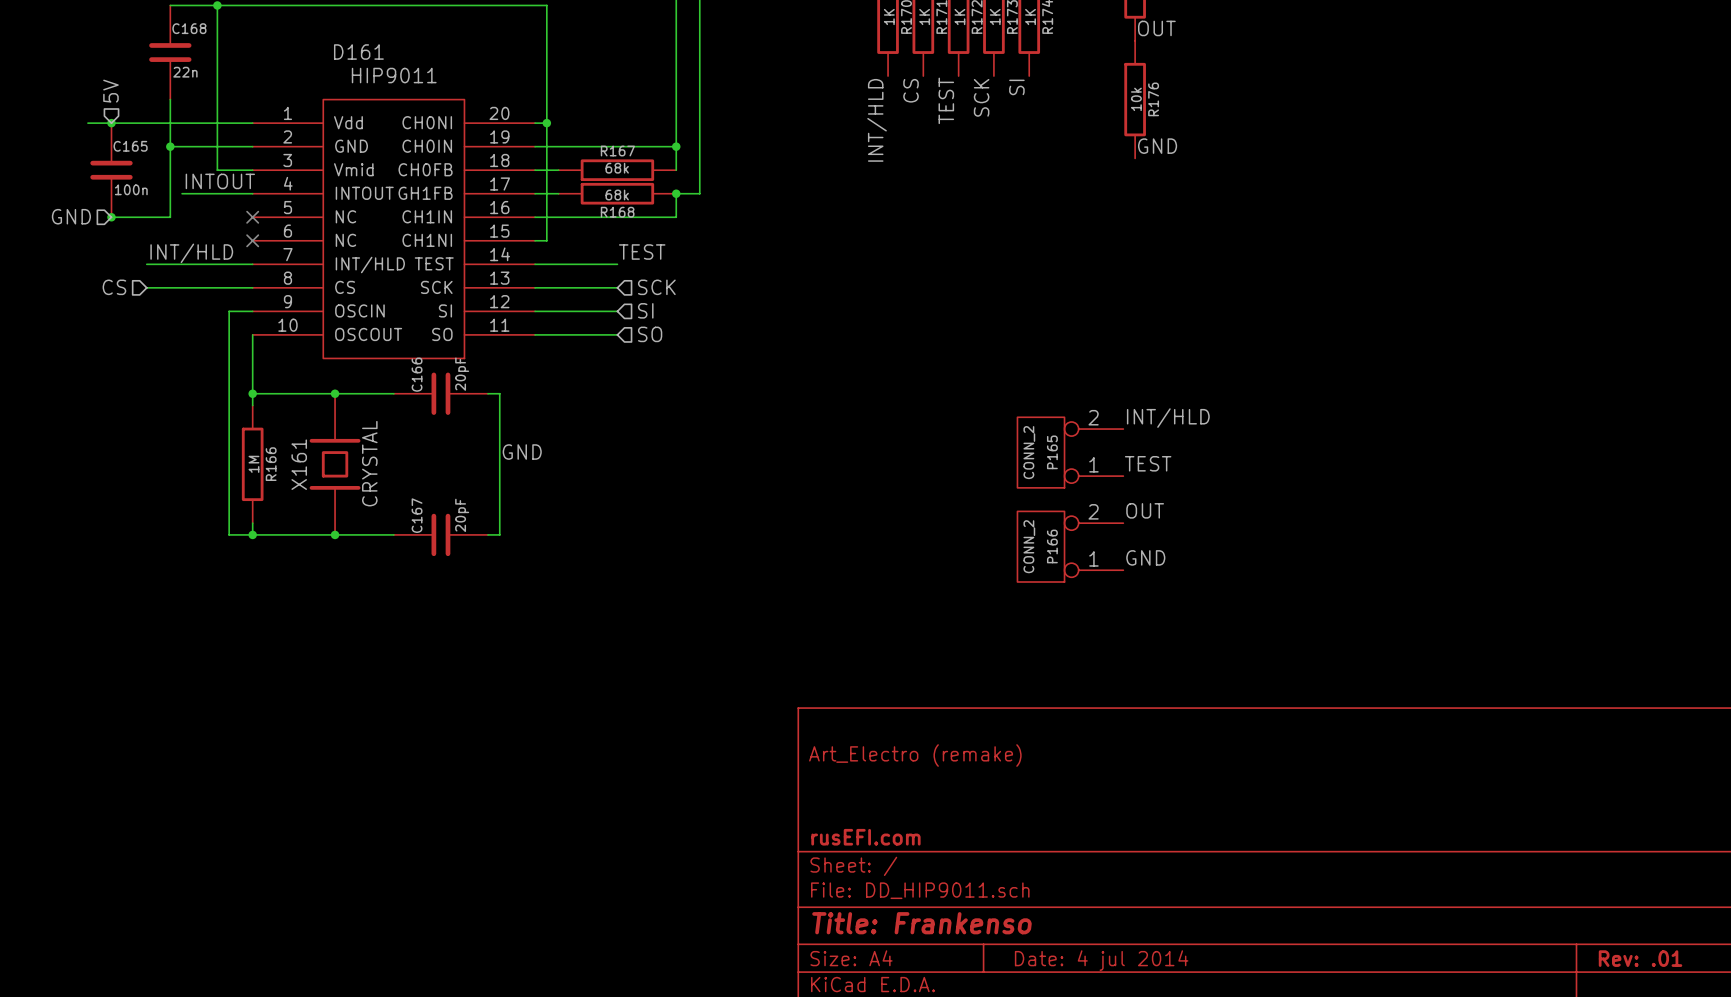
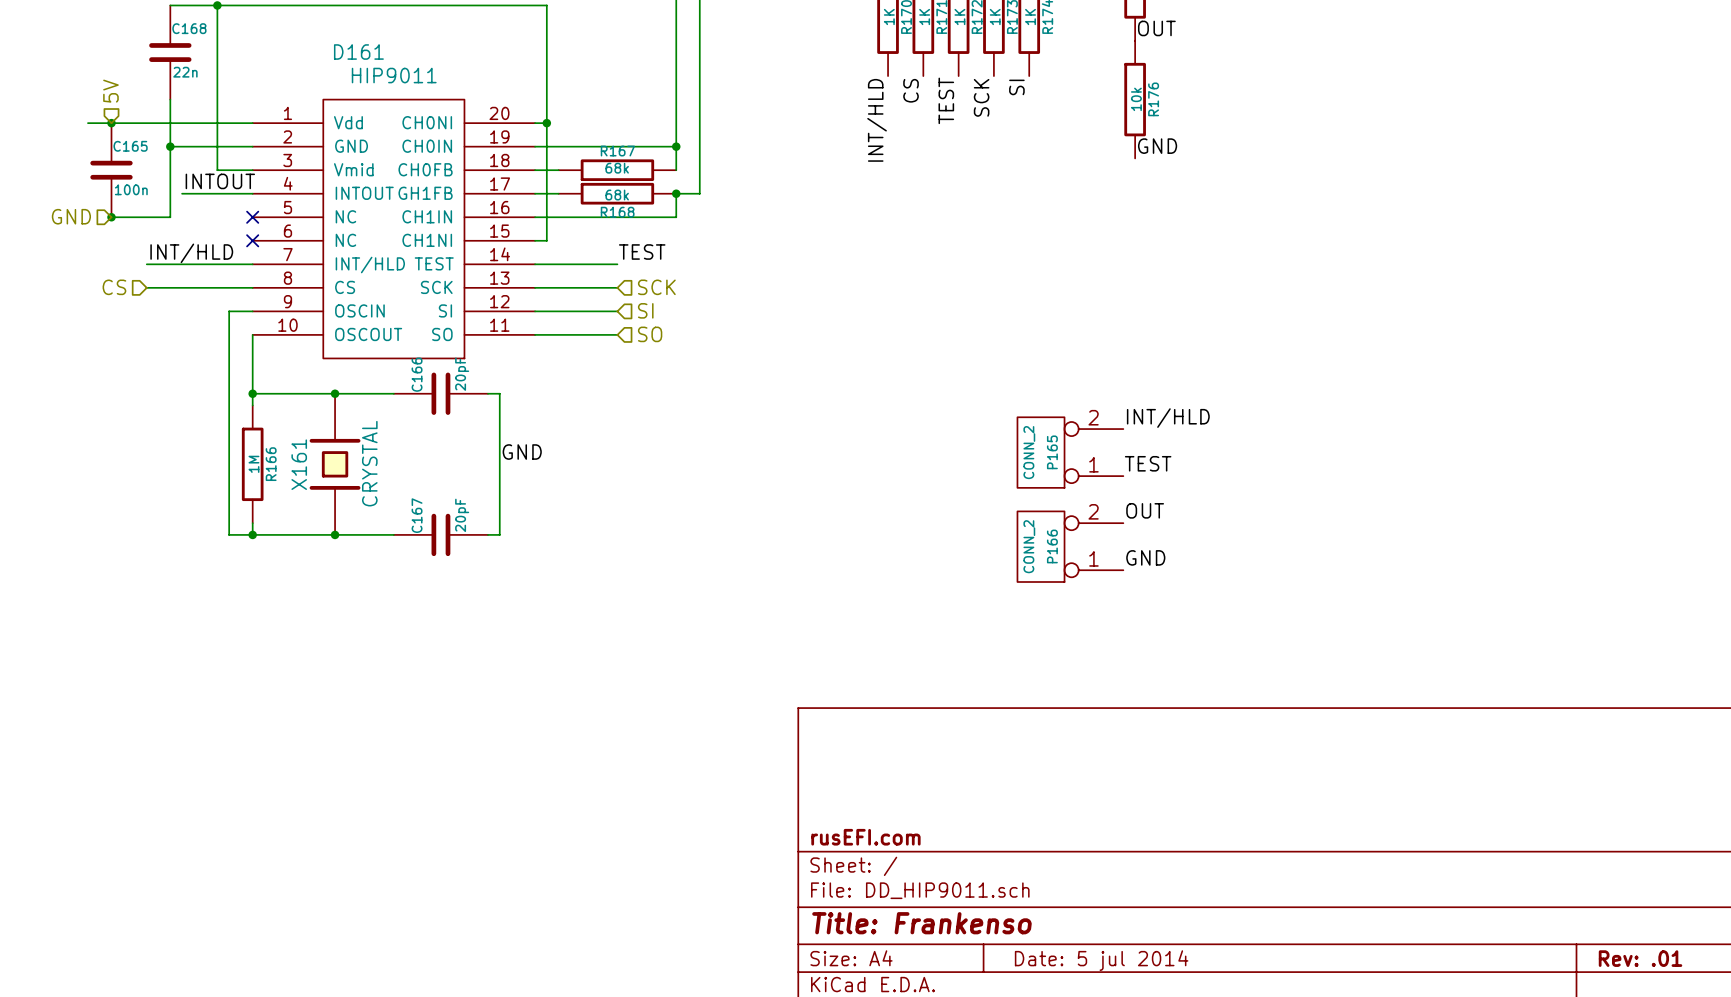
title block: Art_Electro (remake) (915, 755) -> none
title block: Date: 4 jul 2014 (1101, 960) -> Date: 5 jul 2014 (1101, 960)

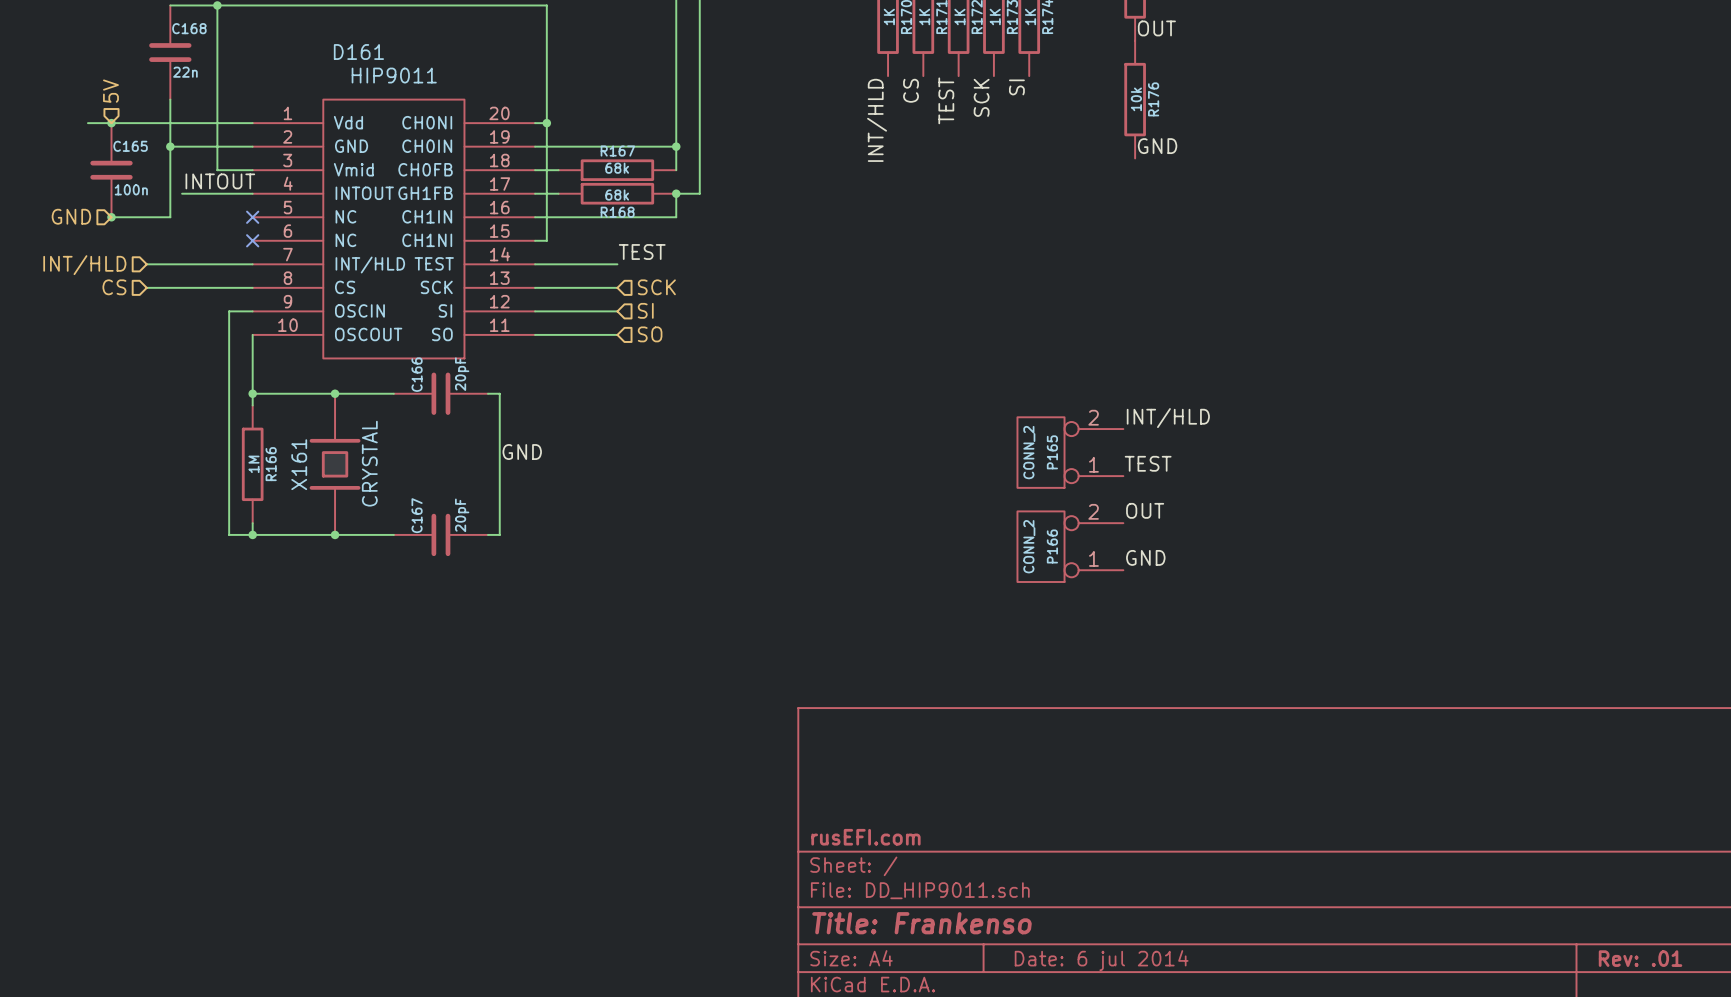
label: INT/HLD (191, 253) -> none
hierarchical label: none -> INT/HLD (84, 265)
title block: Date: 5 jul 2014 (1101, 960) -> Date: 6 jul 2014 (1101, 960)

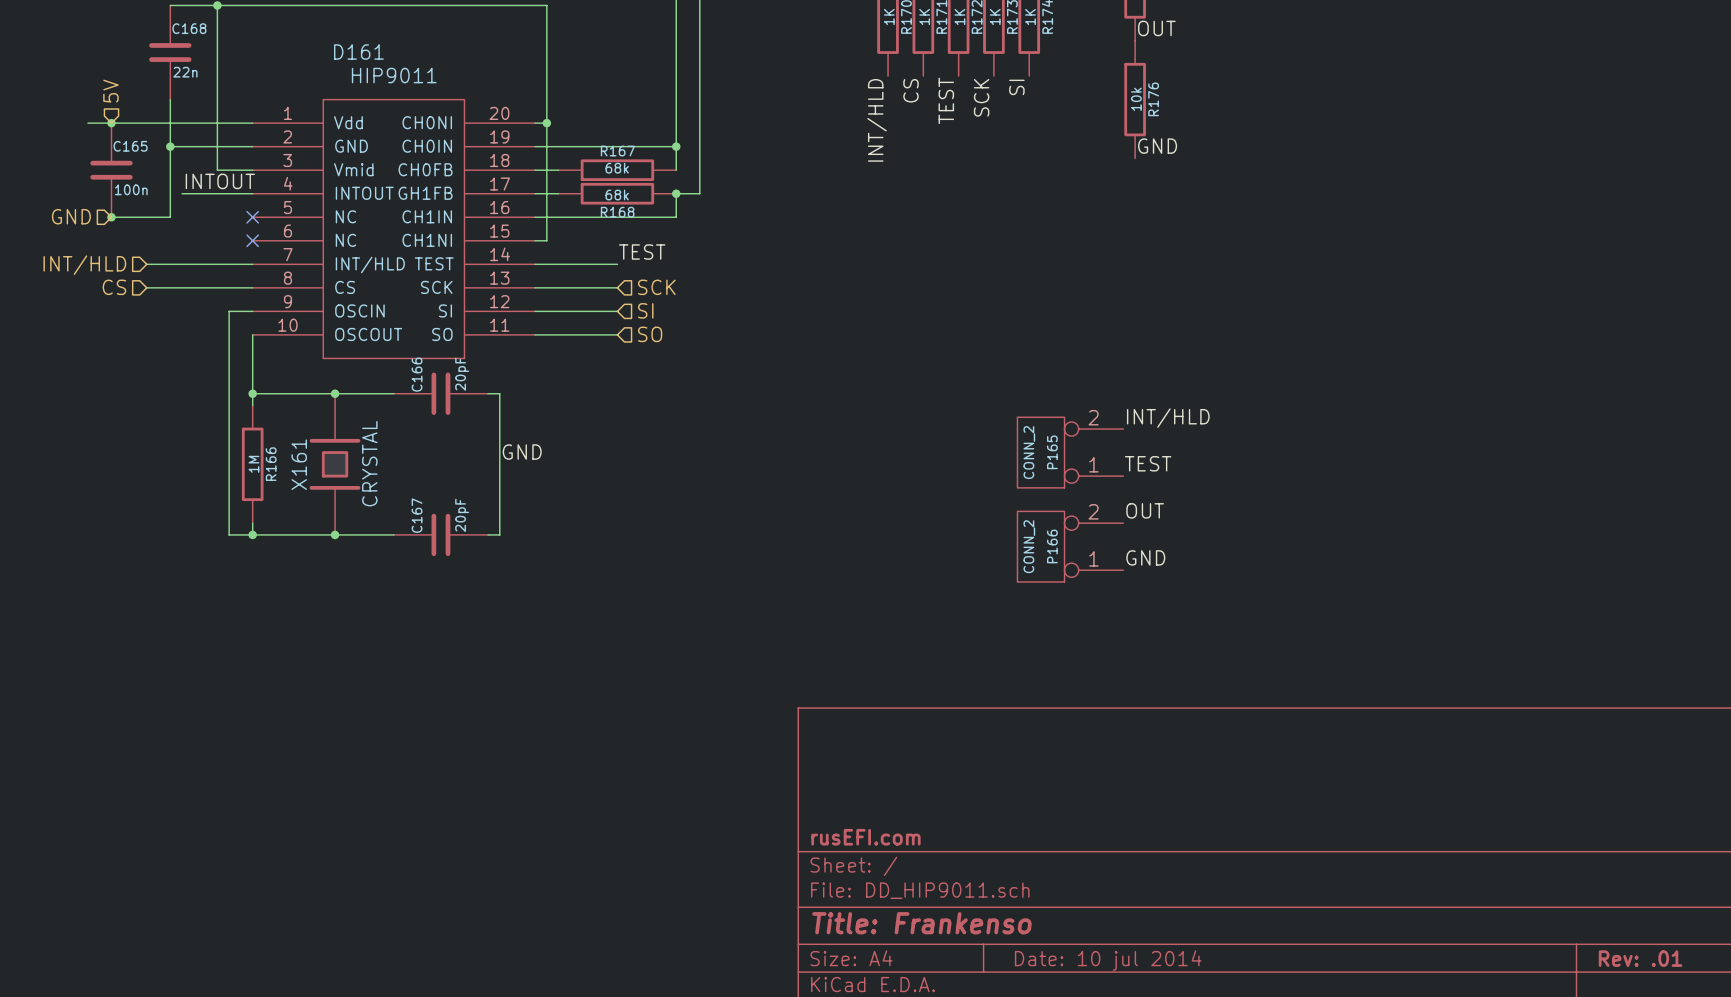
title block: Date: 6 jul 2014 (1101, 960) -> Date: 10 jul 2014 (1108, 960)

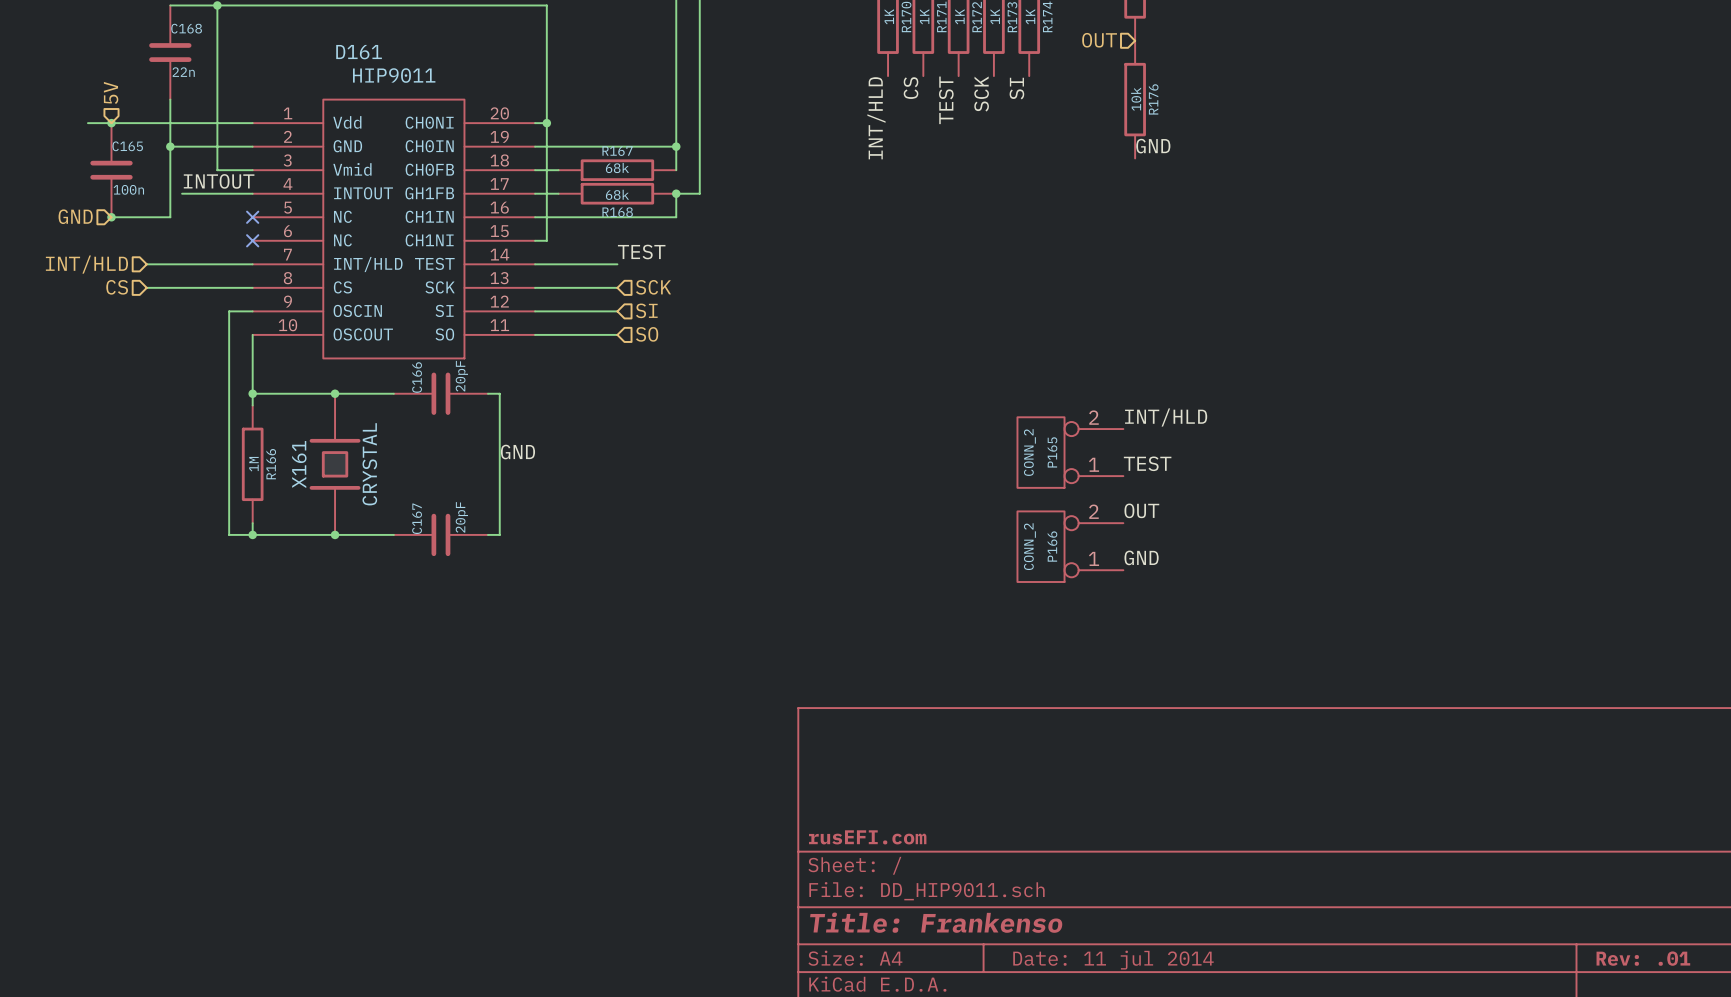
label: OUT (1156, 28) -> none
hierarchical label: none -> OUT (1099, 40)
title block: Date: 10 jul 2014 (1108, 960) -> Date: 11 jul 2014 (1113, 960)

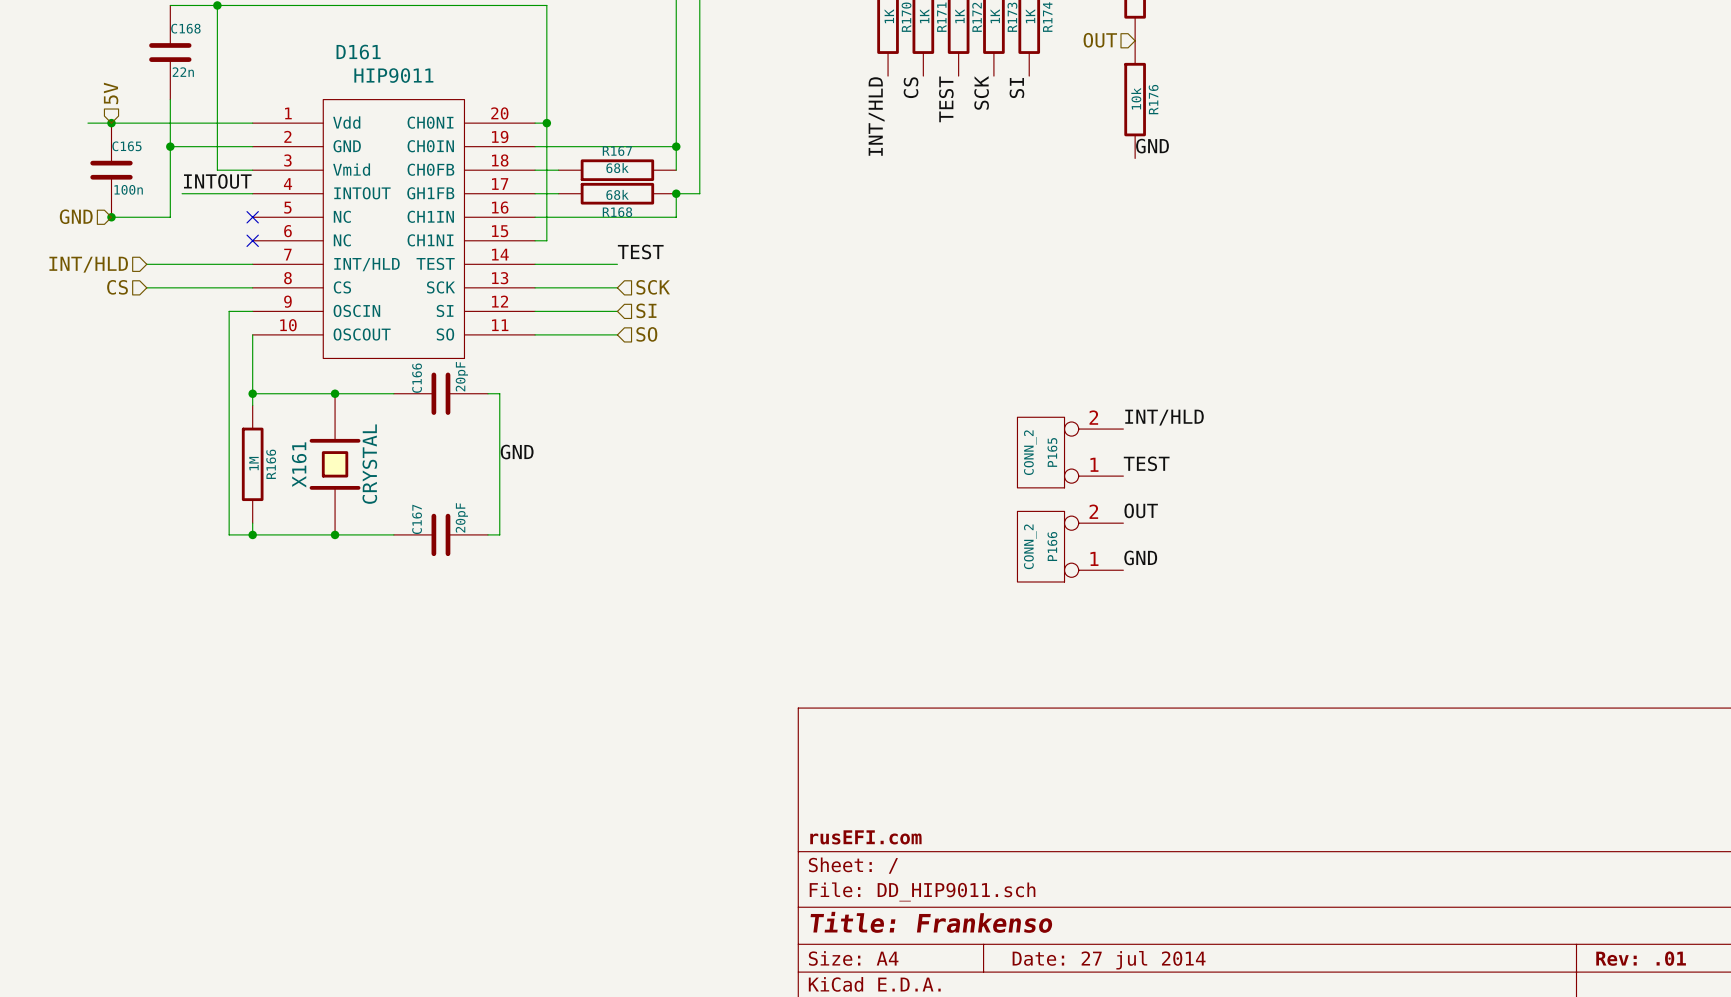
title block: Date: 11 jul 2014 (1113, 960) -> Date: 27 jul 2014 (1109, 960)

